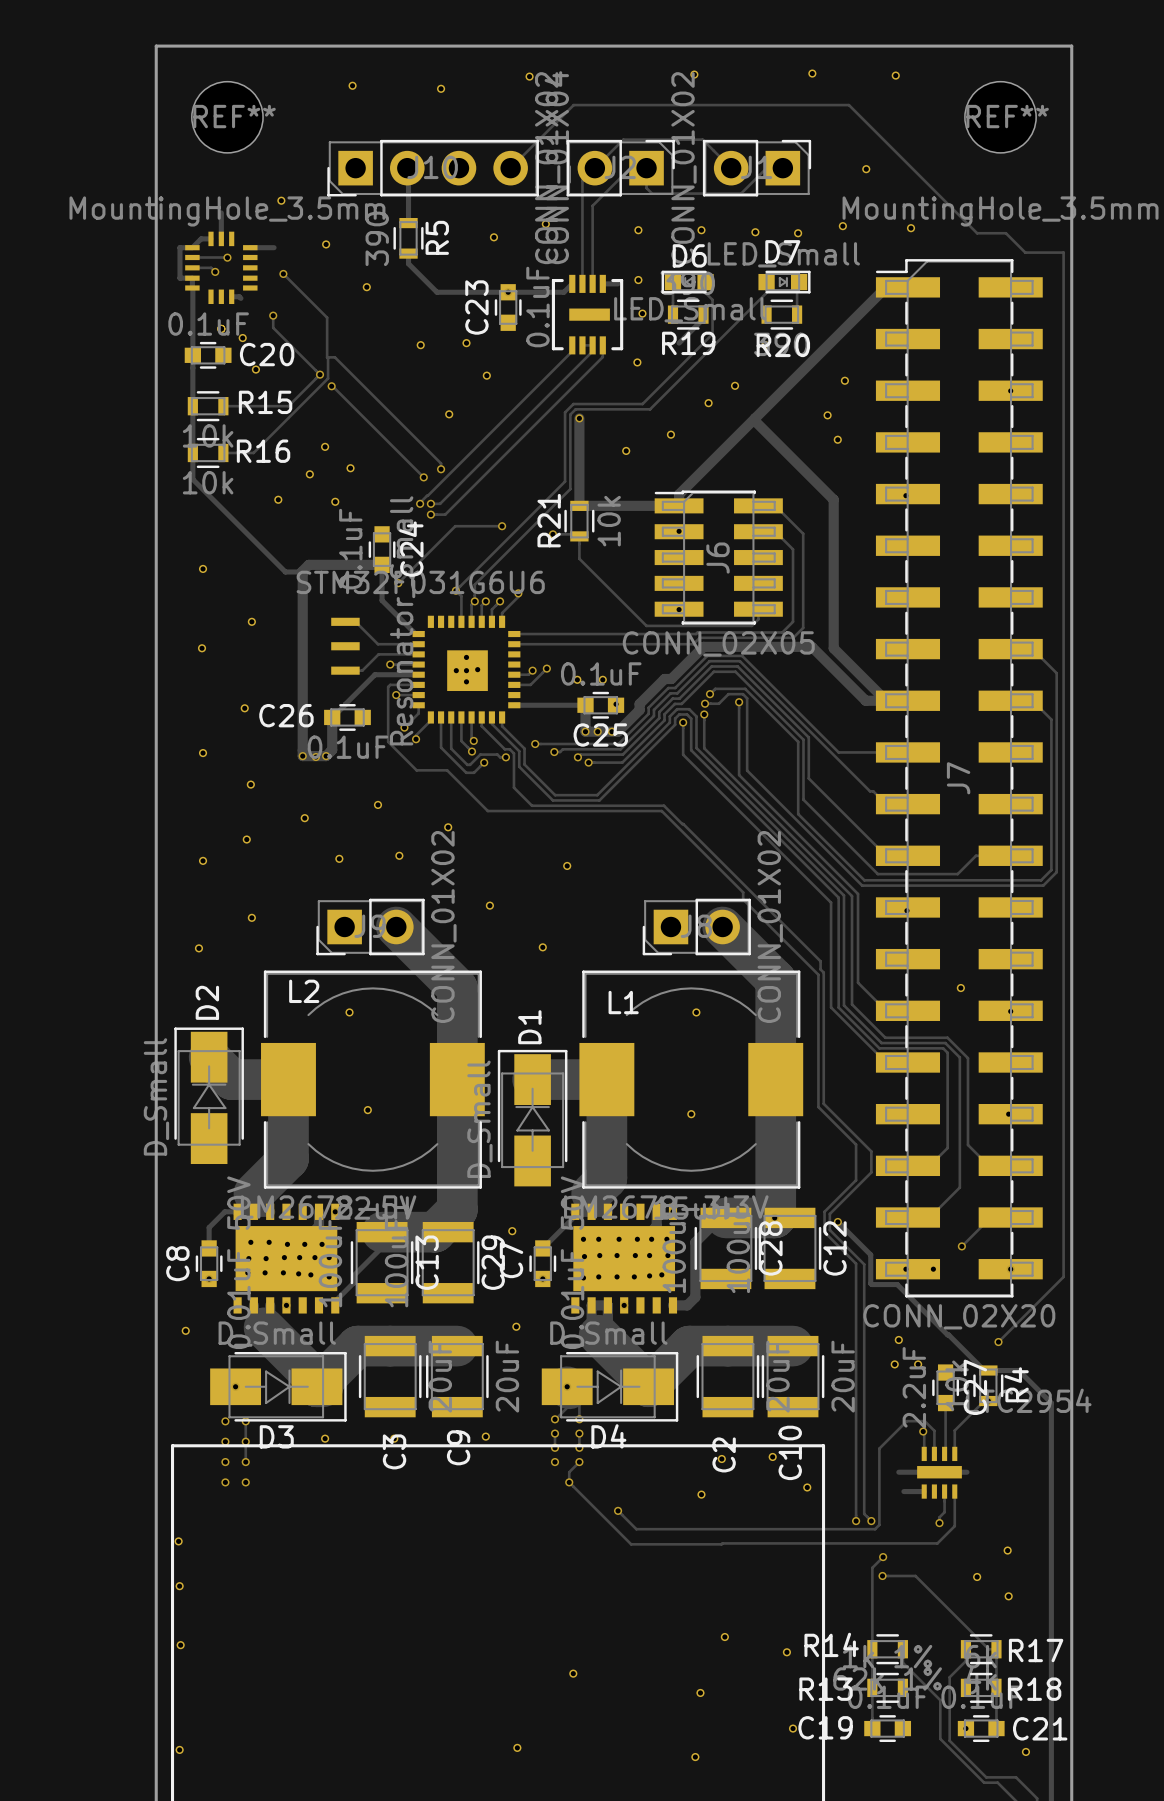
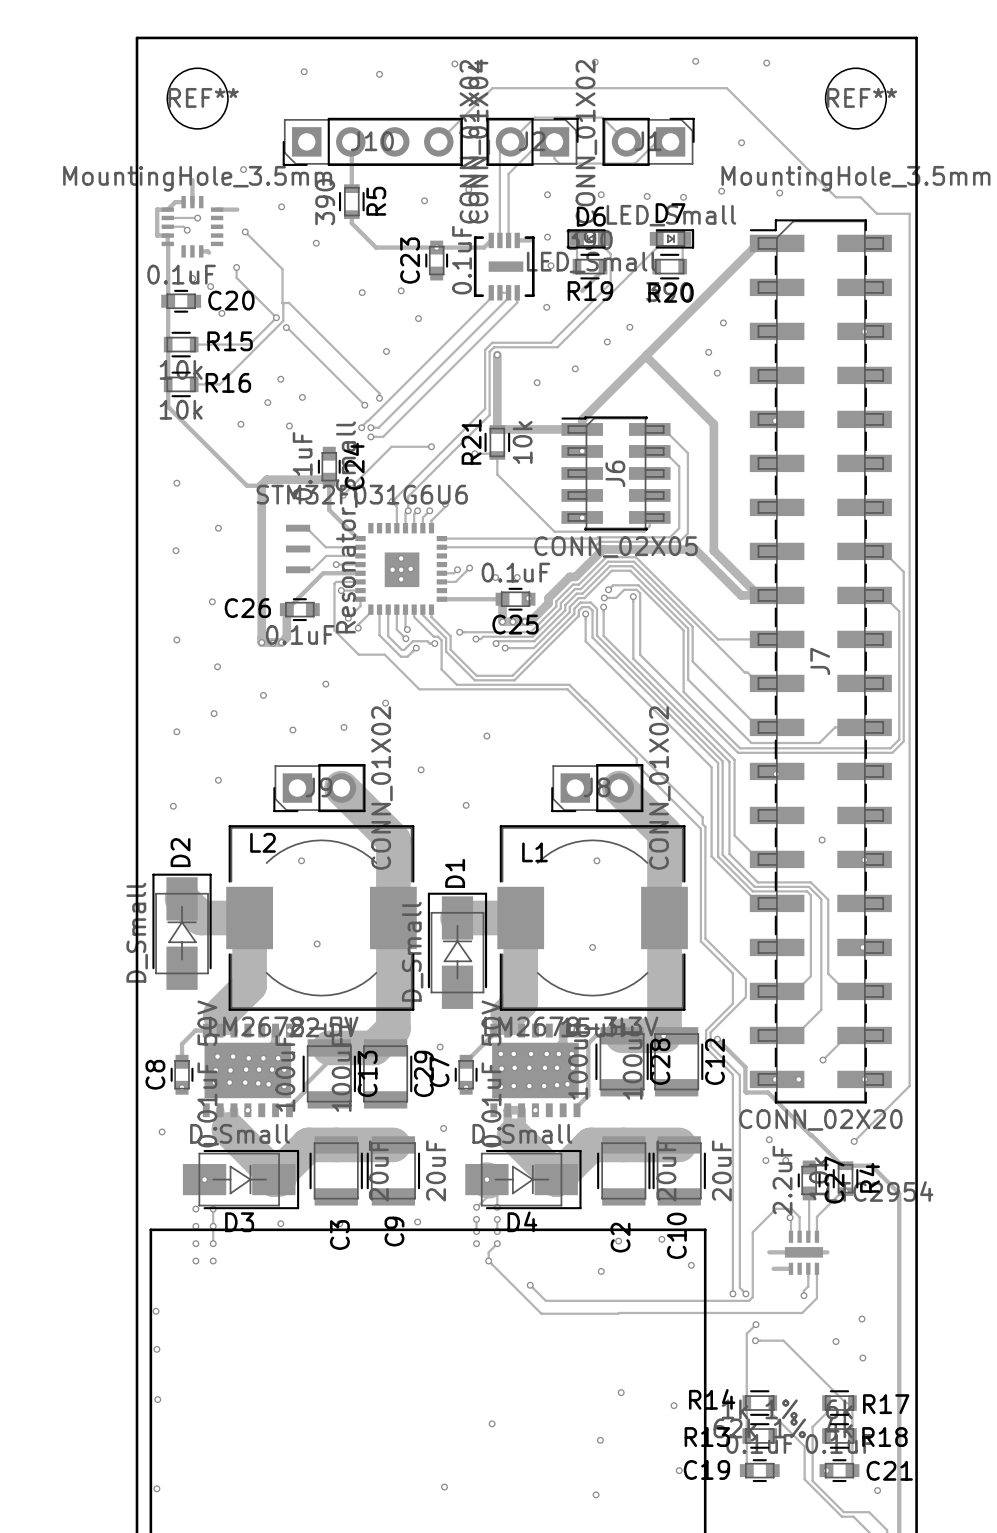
track: (719, 1217) (695, 1242) (695, 1297) (687, 1305) (672, 1305) -> (622, 1035) (596, 1035) (588, 1043) (588, 1095) (577, 1106) (577, 1110)

